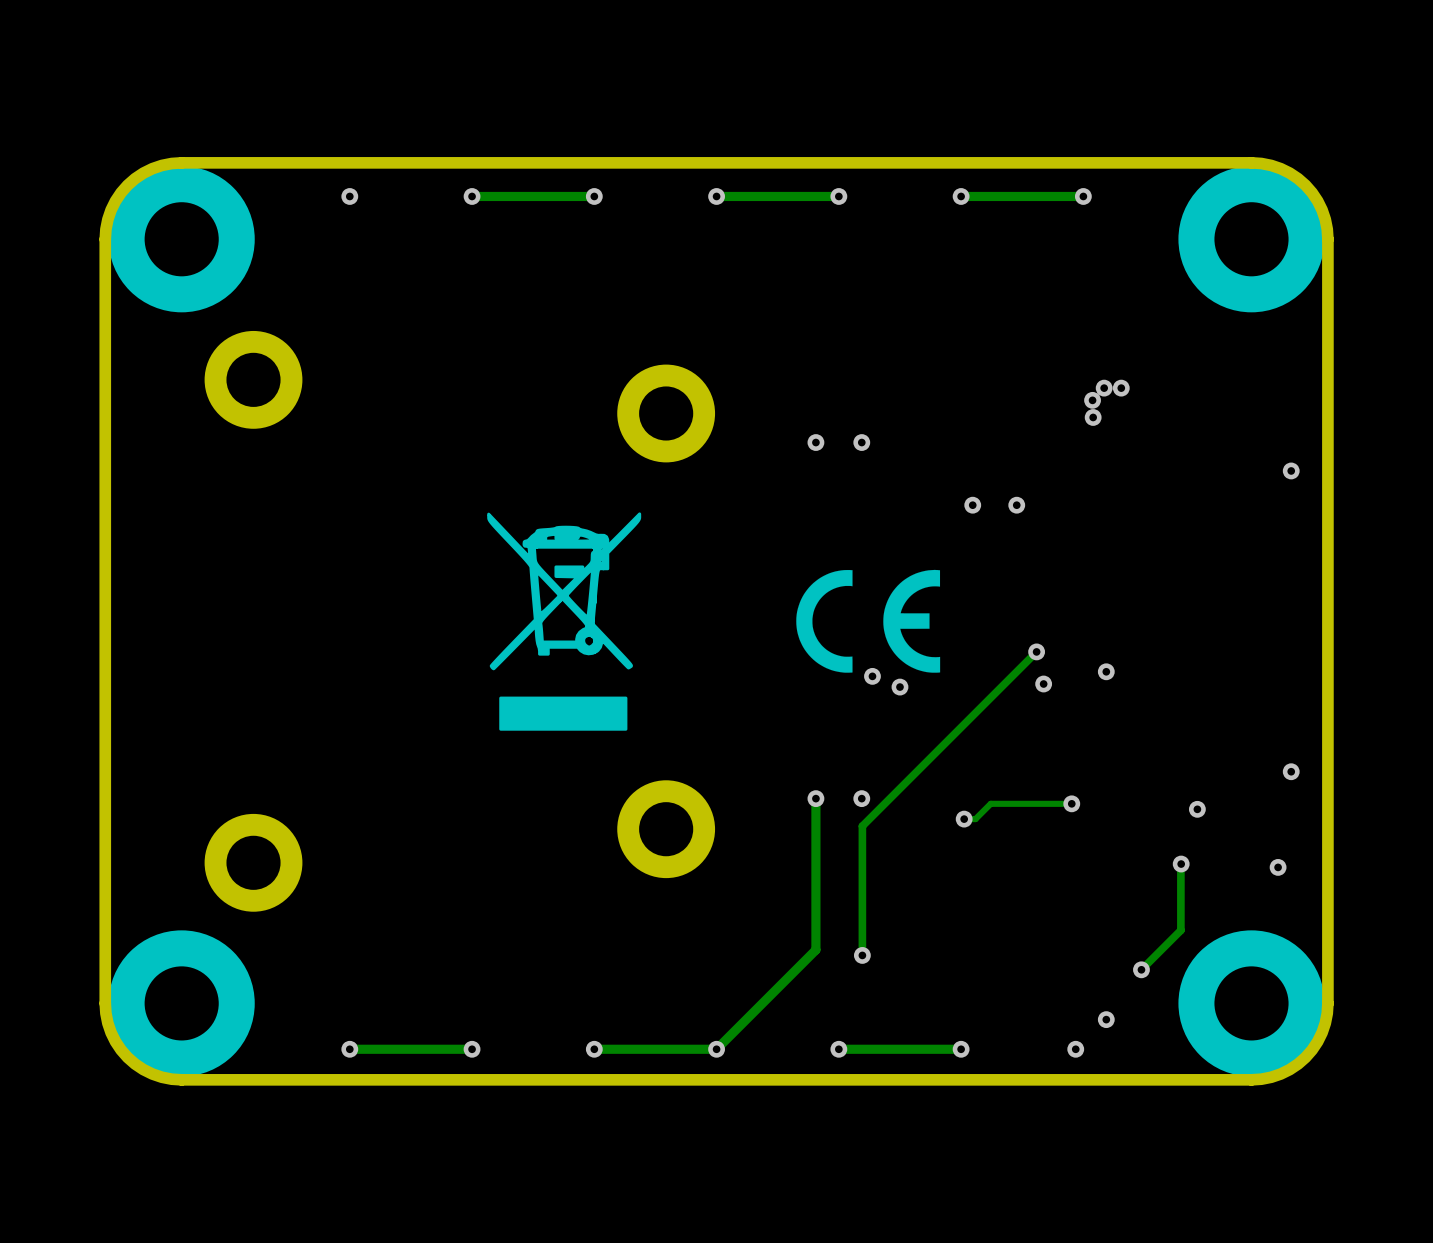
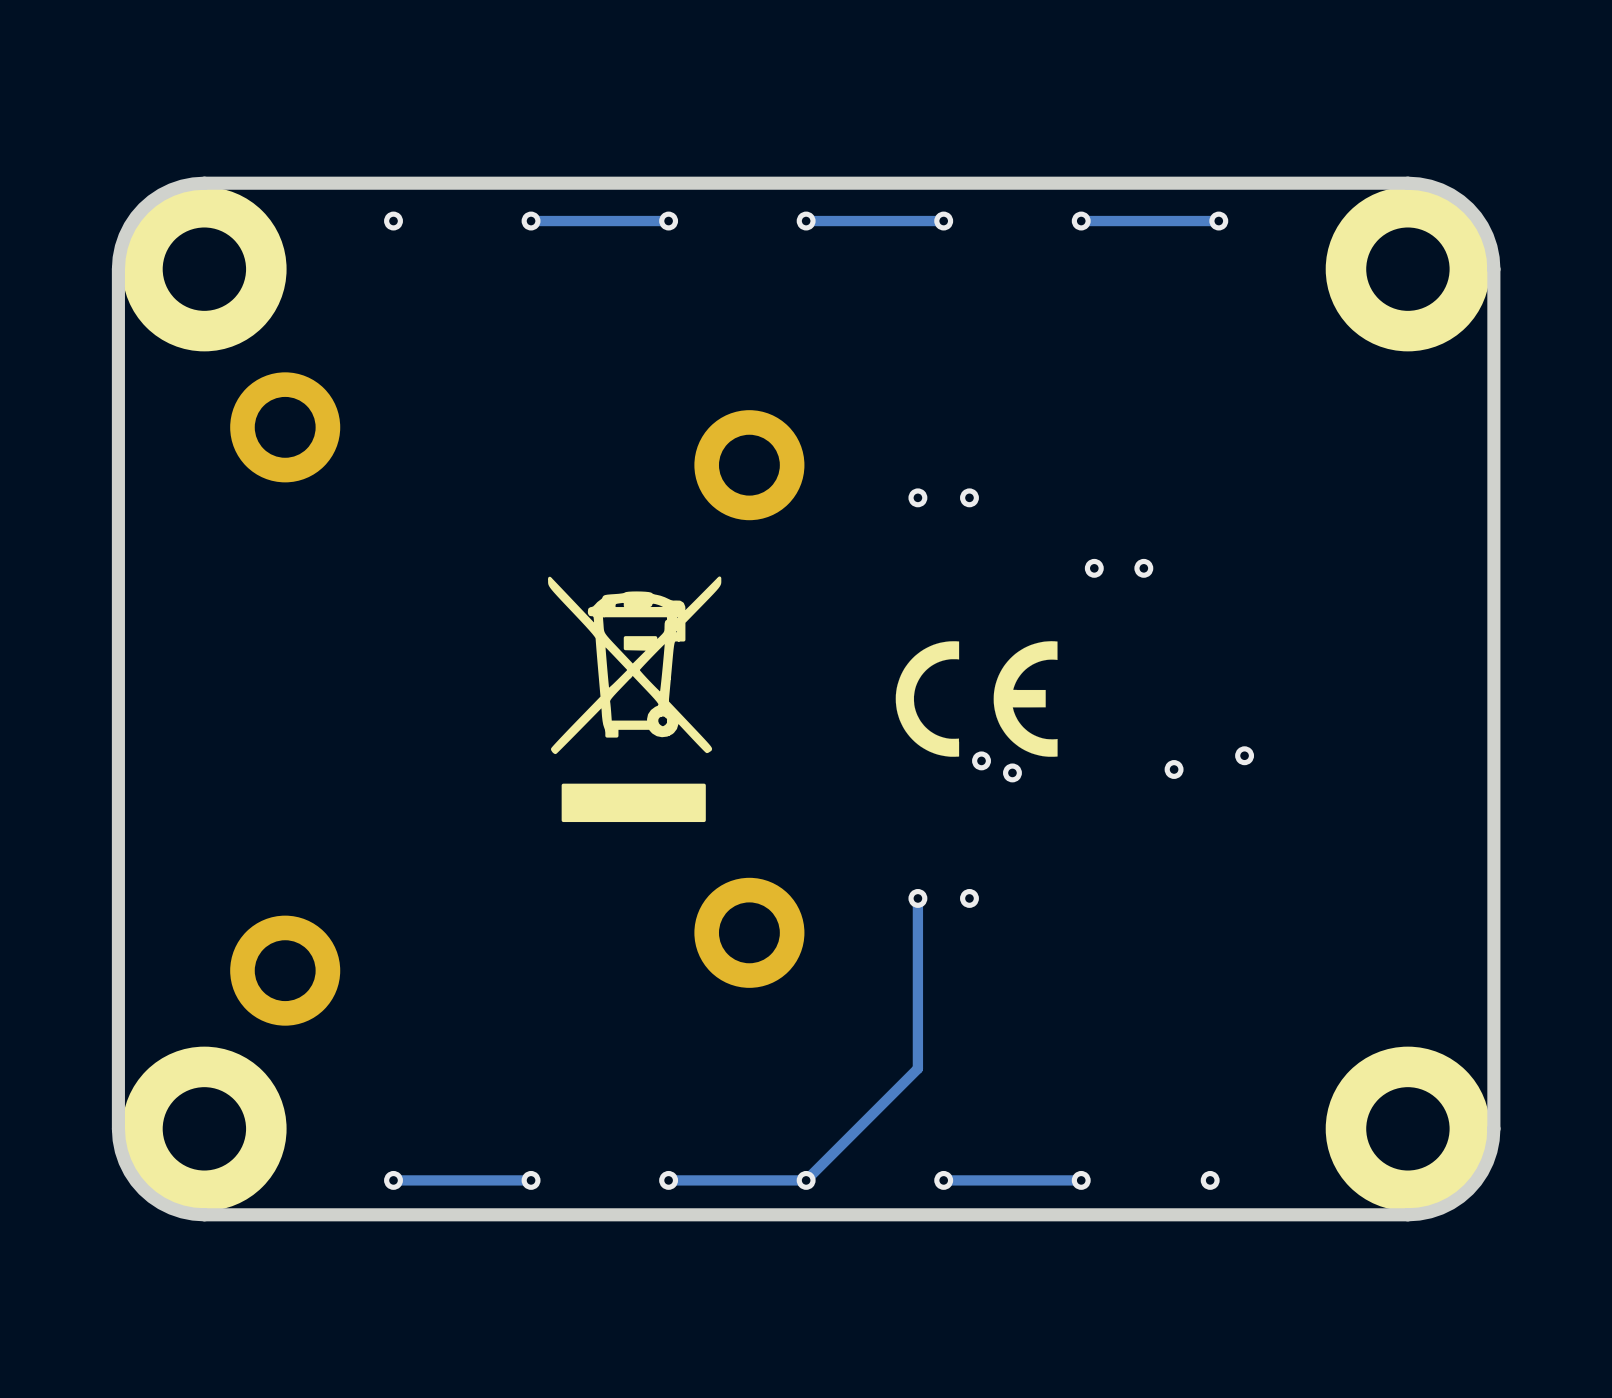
via: (1104, 388) -> none
via: (1121, 388) -> none
via: (1092, 400) -> none
via: (1093, 417) -> none
via: (1291, 470) -> none
track: (1036, 651) (862, 826) (862, 955) -> none
via: (1036, 651) -> none
via: (1291, 771) -> none
track: (1071, 803) (990, 803) (975, 819) (964, 819) -> none
via: (1071, 803) -> none
via: (1197, 809) -> none
via: (964, 819) -> none
track: (1180, 864) (1180, 930) (1141, 969) -> none
via: (1181, 864) -> none
via: (1278, 867) -> none
via: (862, 955) -> none
via: (1141, 969) -> none
via: (1106, 1019) -> none

